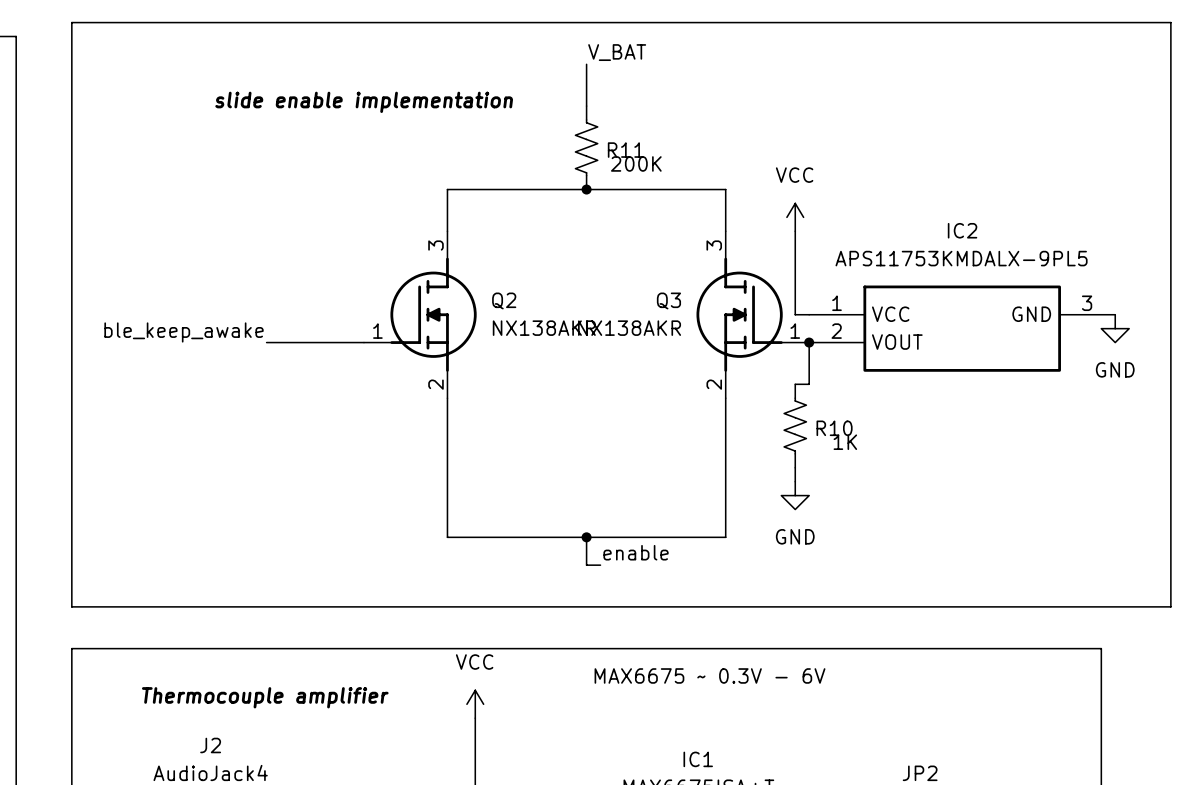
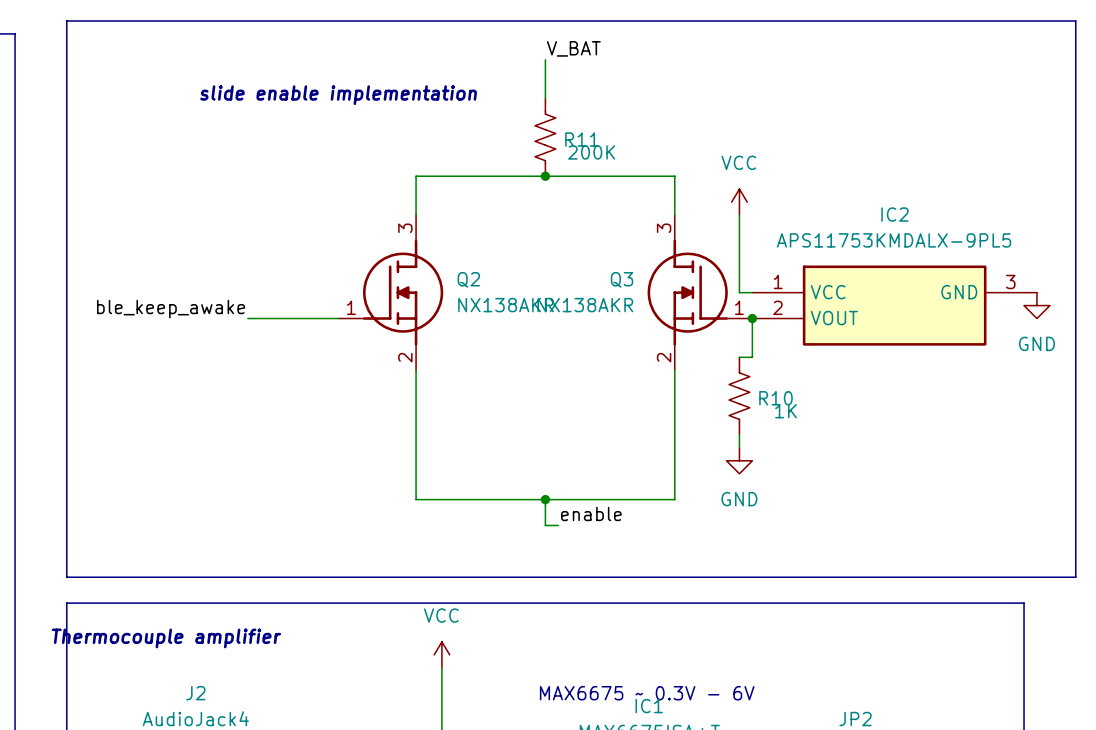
line: (1156, 22) (1170, 22) (1170, 606) (71, 606) -> (1075, 21) (1075, 577) (66, 577) (66, 564)
text position: MAX6675 ~ 0.3V - 6V (710, 675) -> MAX6675 ~ 0.3V - 6V (647, 693)
text position: Thermocouple amplifier (265, 697) -> Thermocouple amplifier (166, 638)

